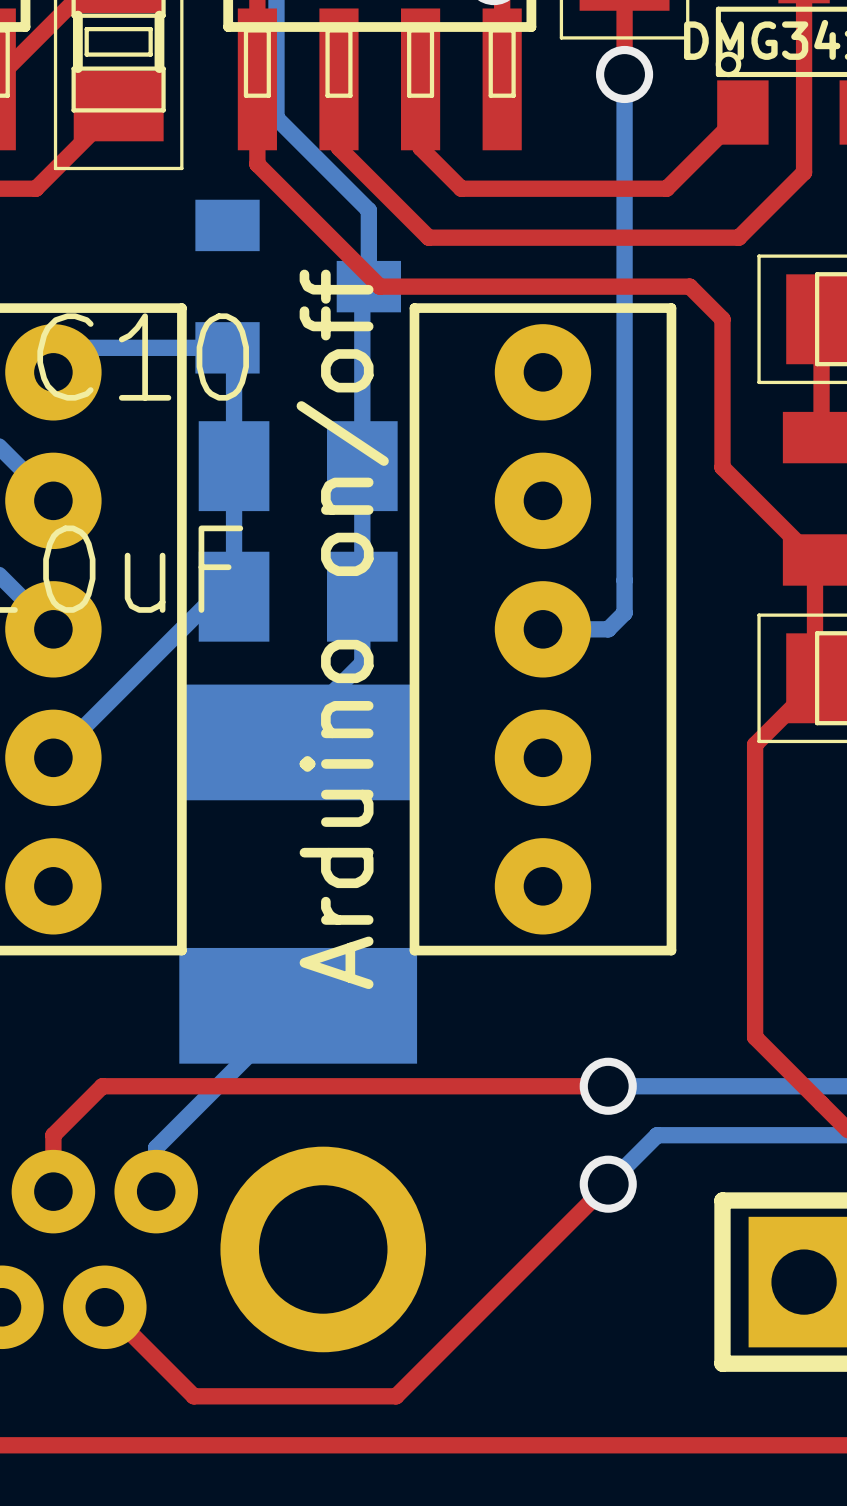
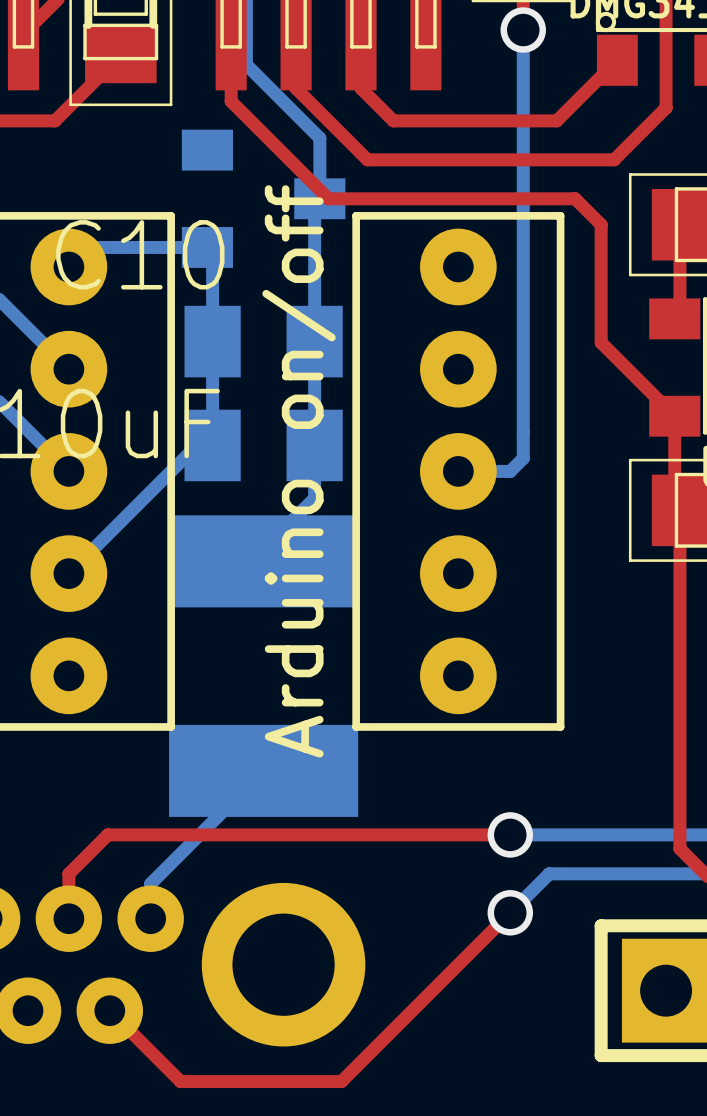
top track: (821, 678) (755, 744) (755, 1037) (821, 1103) -> (679, 510) (679, 848)

